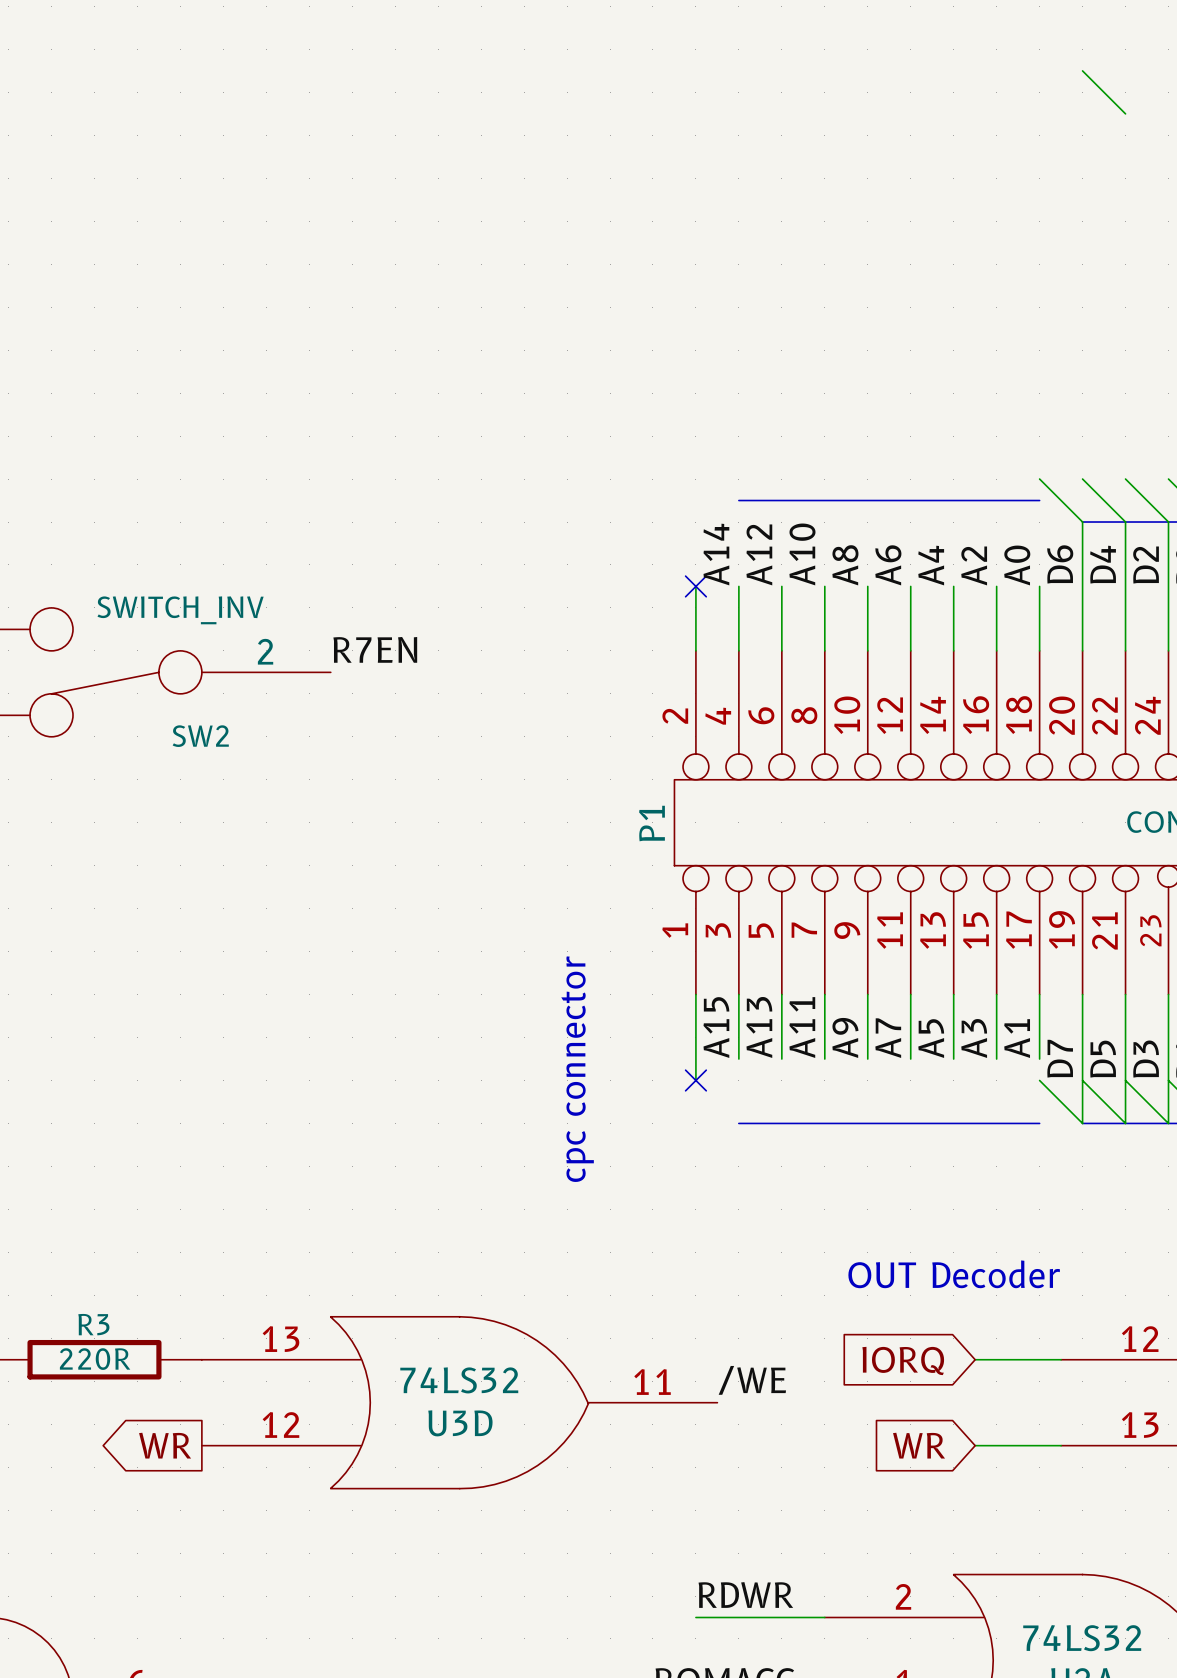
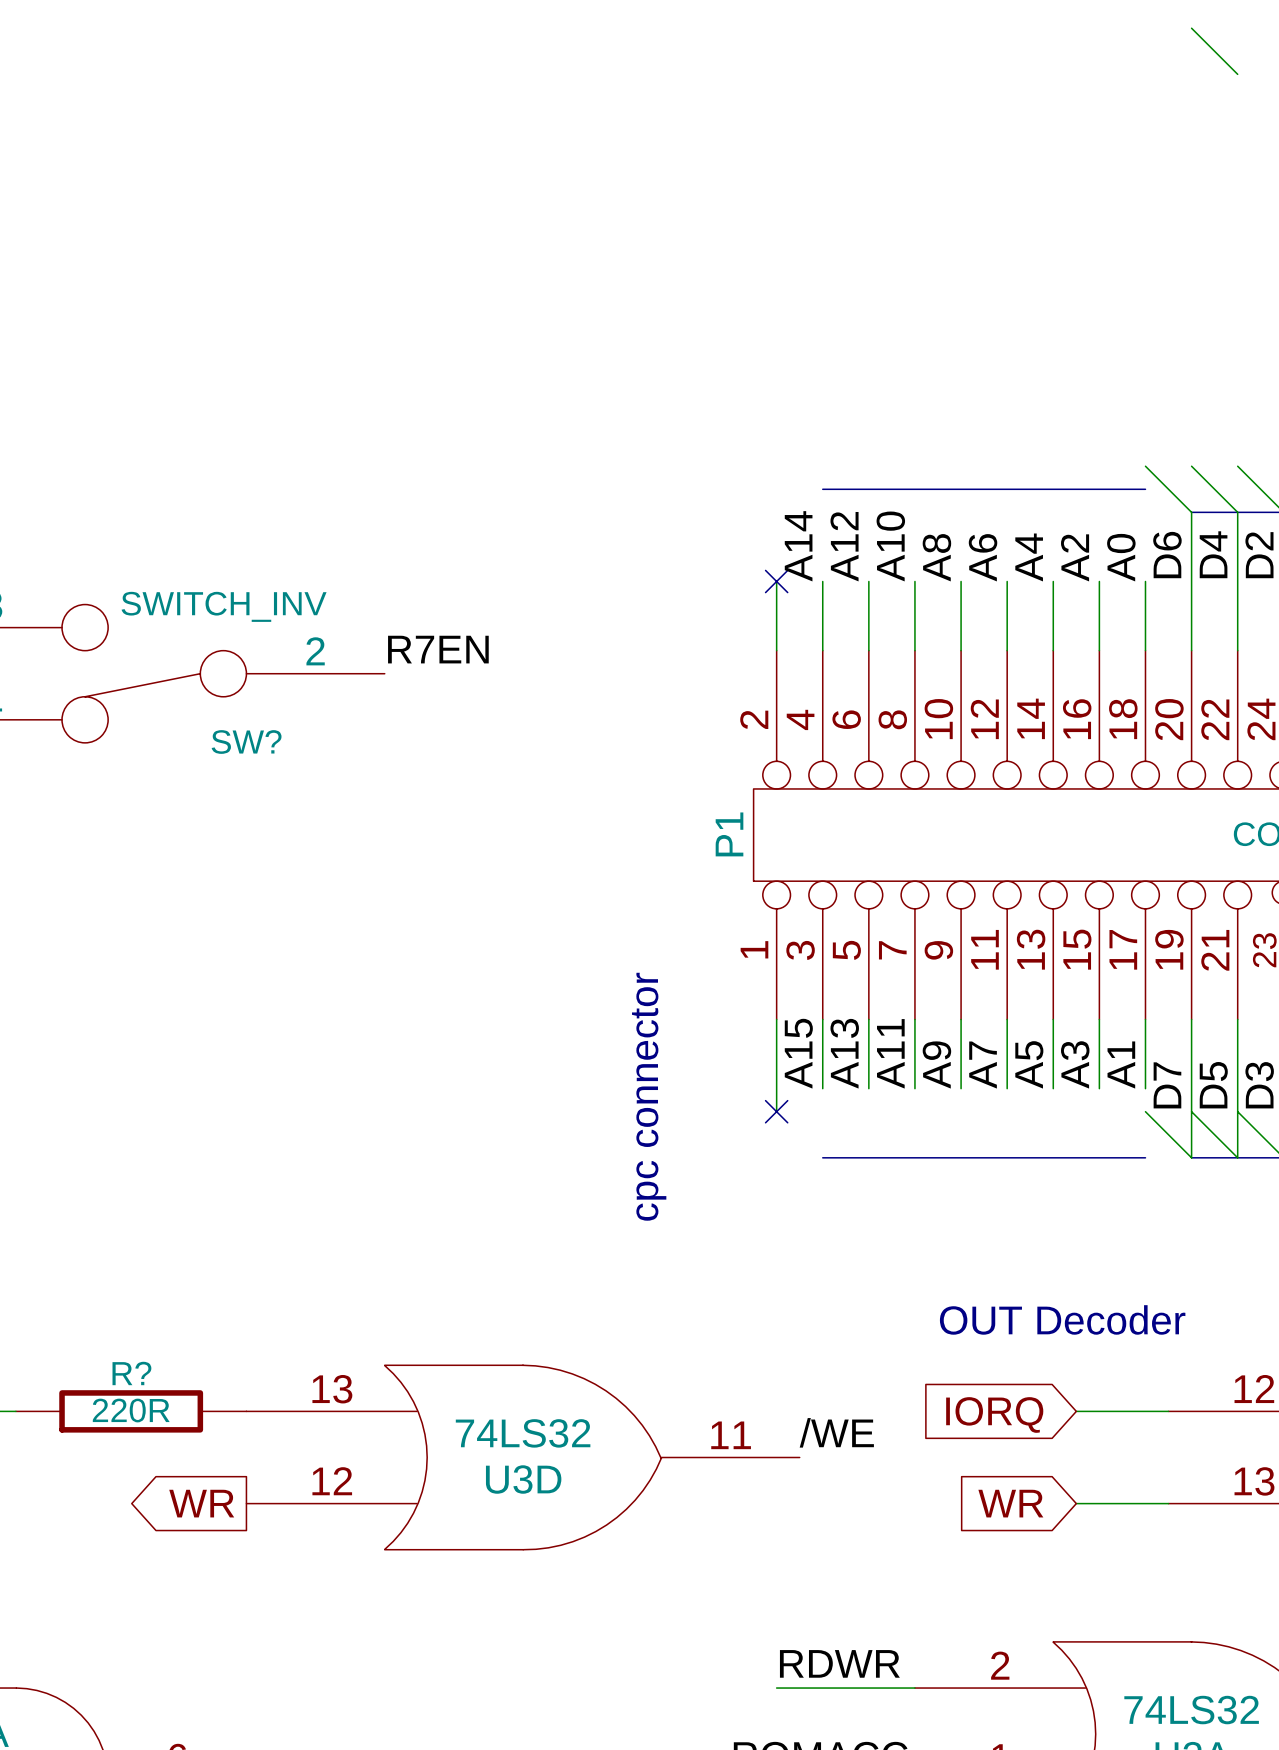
SW2 name: SW2 (200, 736) -> SW? (246, 742)
R3 name: R3 (93, 1324) -> R? (131, 1373)

